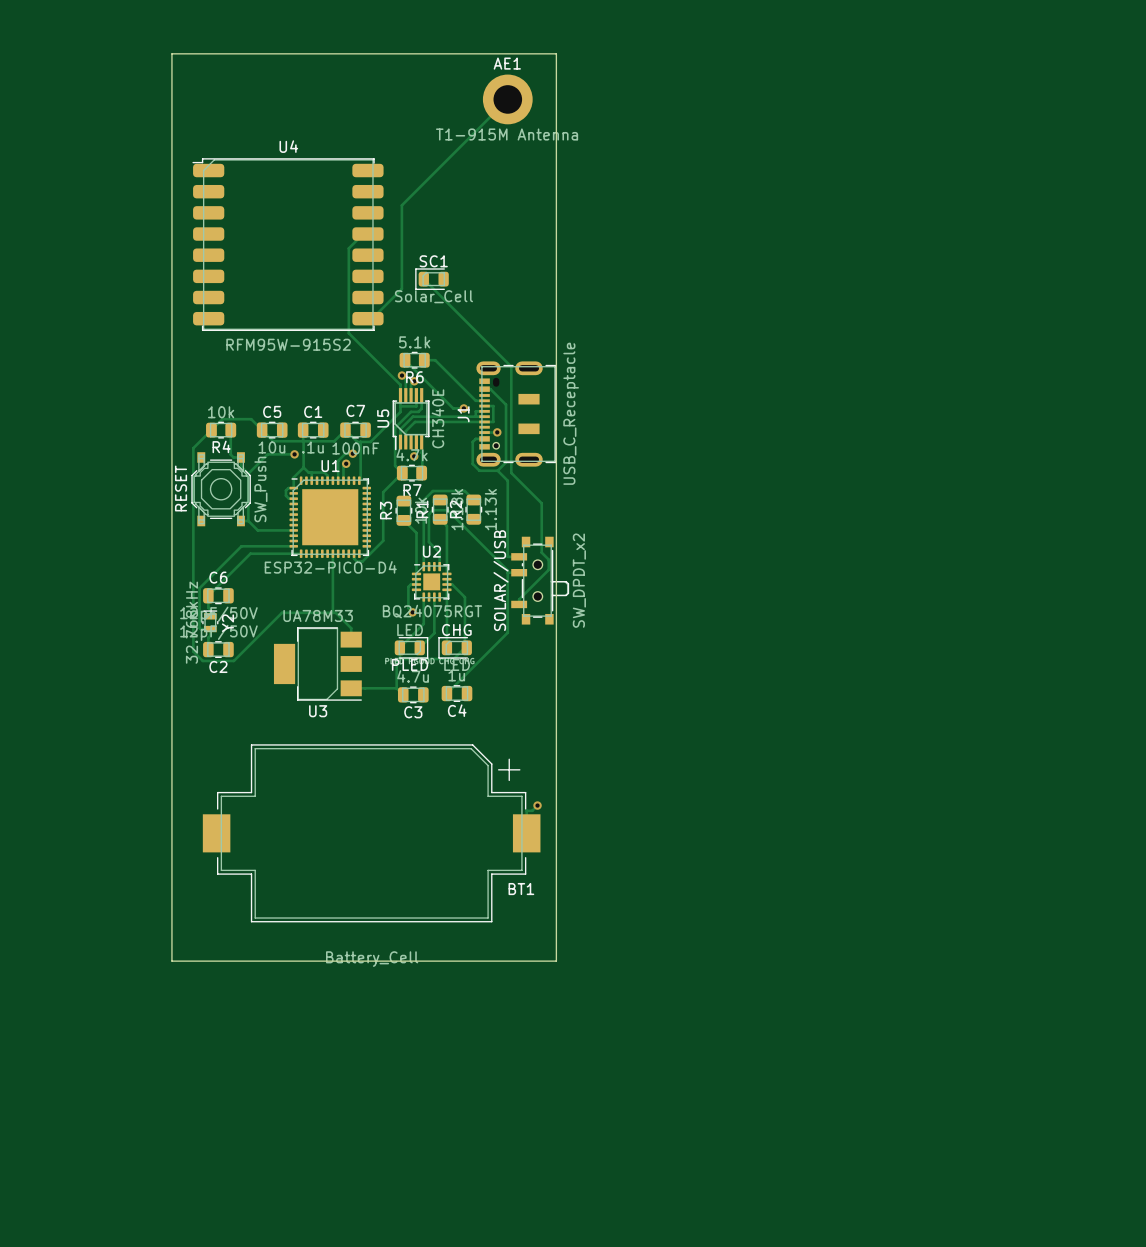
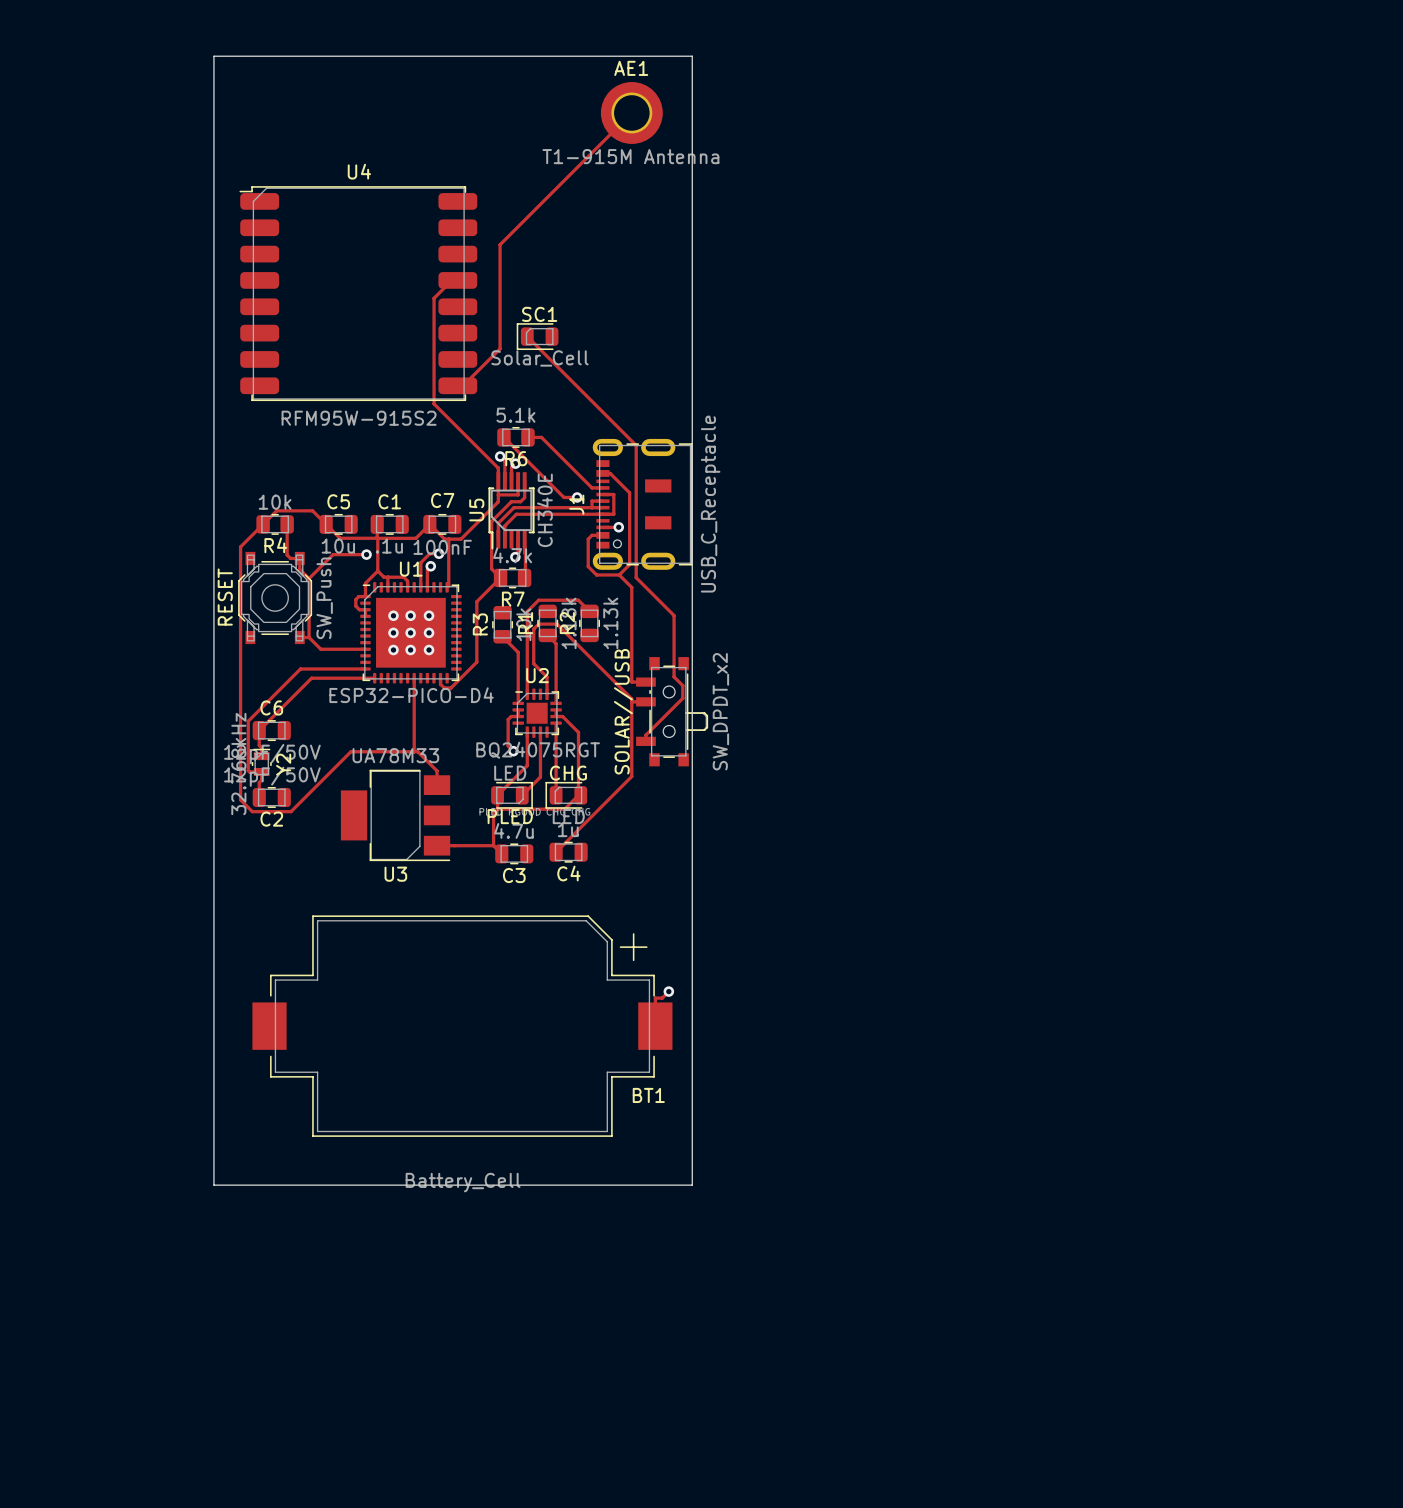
via: none -> (393, 615)
via: none -> (410, 615)
via: none -> (429, 615)
via: none -> (393, 632)
via: none -> (410, 632)
via: none -> (429, 632)
via: none -> (393, 650)
via: none -> (410, 650)
via: none -> (429, 650)

